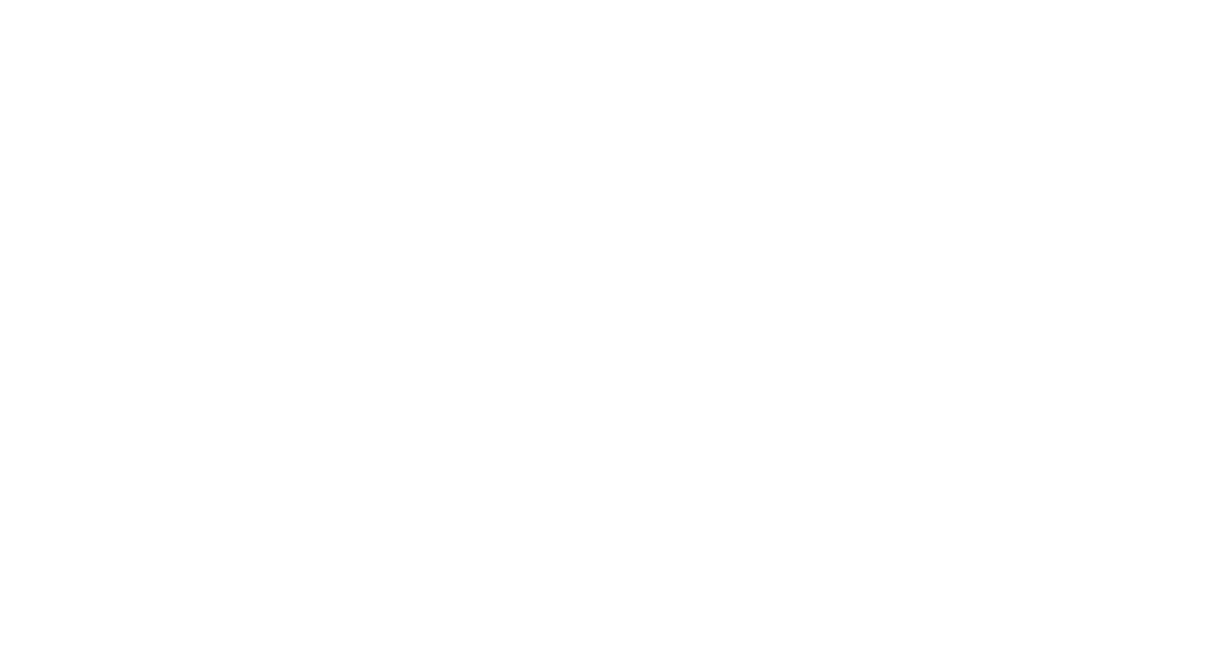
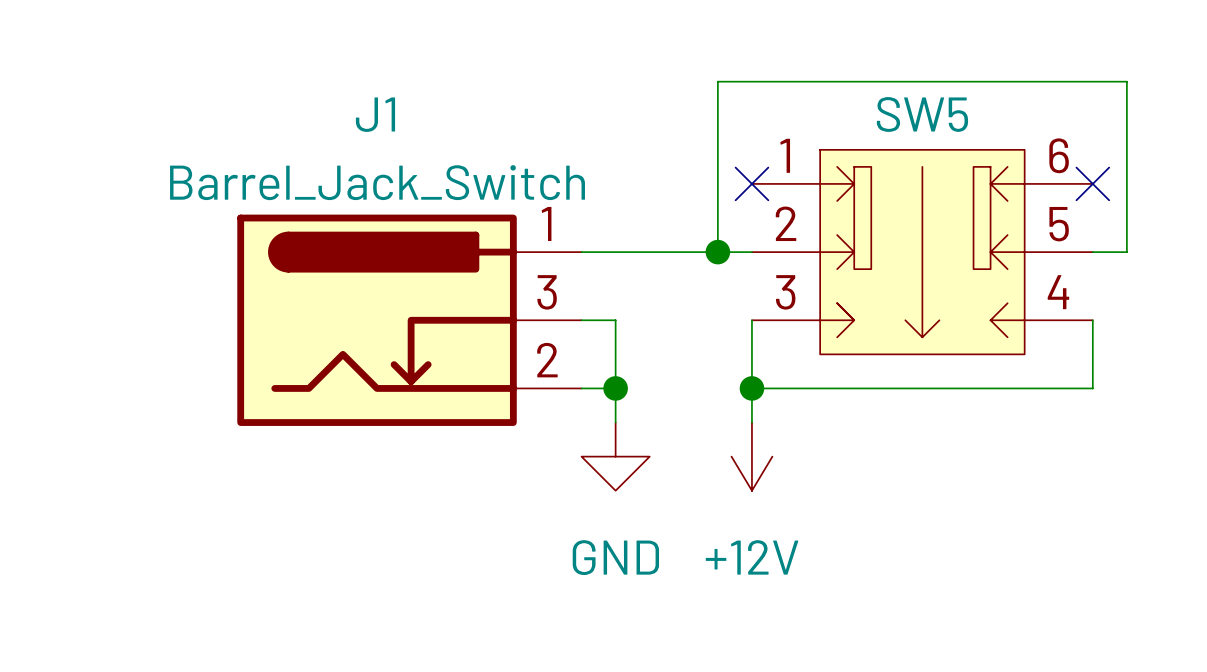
no-connect mark: none -> (751, 183)
no-connect mark: none -> (1092, 183)
wire: none -> (581, 252) (751, 252)
wire: none -> (717, 252) (717, 81) (1126, 81) (1126, 252) (1092, 252)
junction: none -> (717, 252)
SW5: none -> (922, 252)
J1: none -> Barrel_Jack_Switch (409, 320)
wire: none -> (581, 320) (615, 320) (615, 422)
wire: none -> (751, 320) (751, 422)
wire: none -> (1092, 320) (1092, 388) (751, 388)
wire: none -> (581, 388) (615, 388)
junction: none -> (615, 388)
junction: none -> (751, 388)
power symbol: none -> GND (615, 456)
power symbol: none -> +12V (751, 456)

